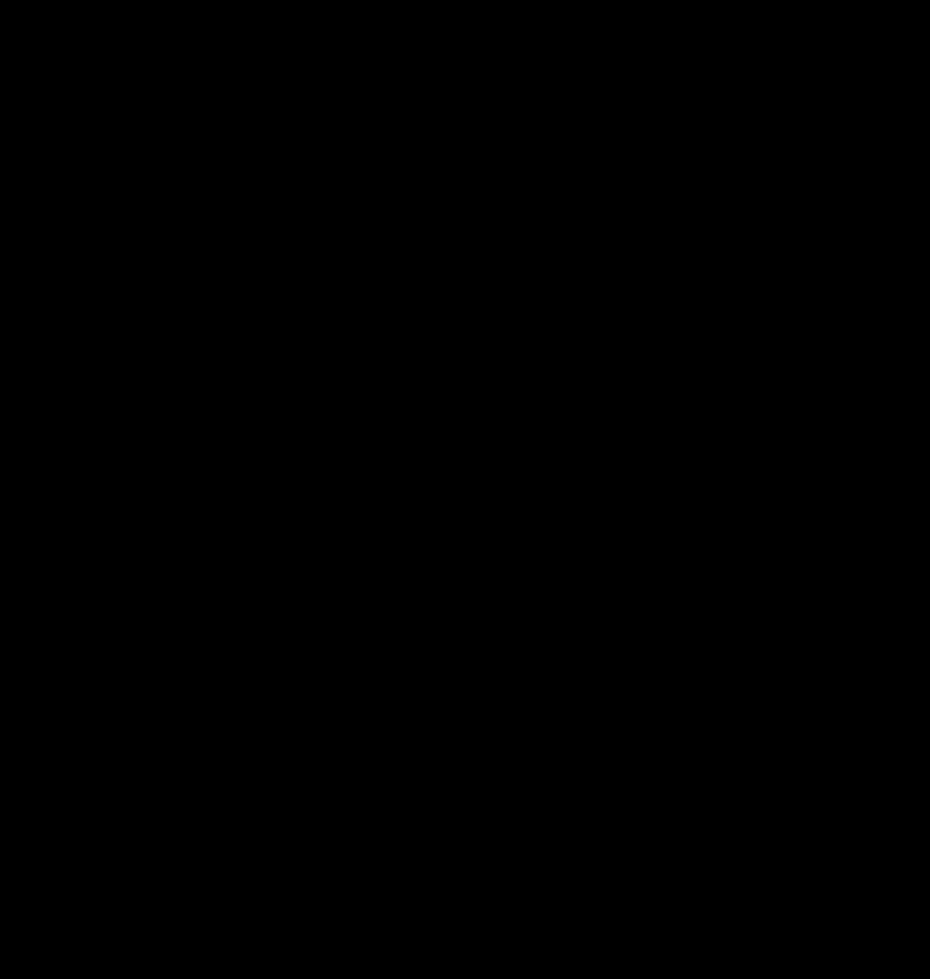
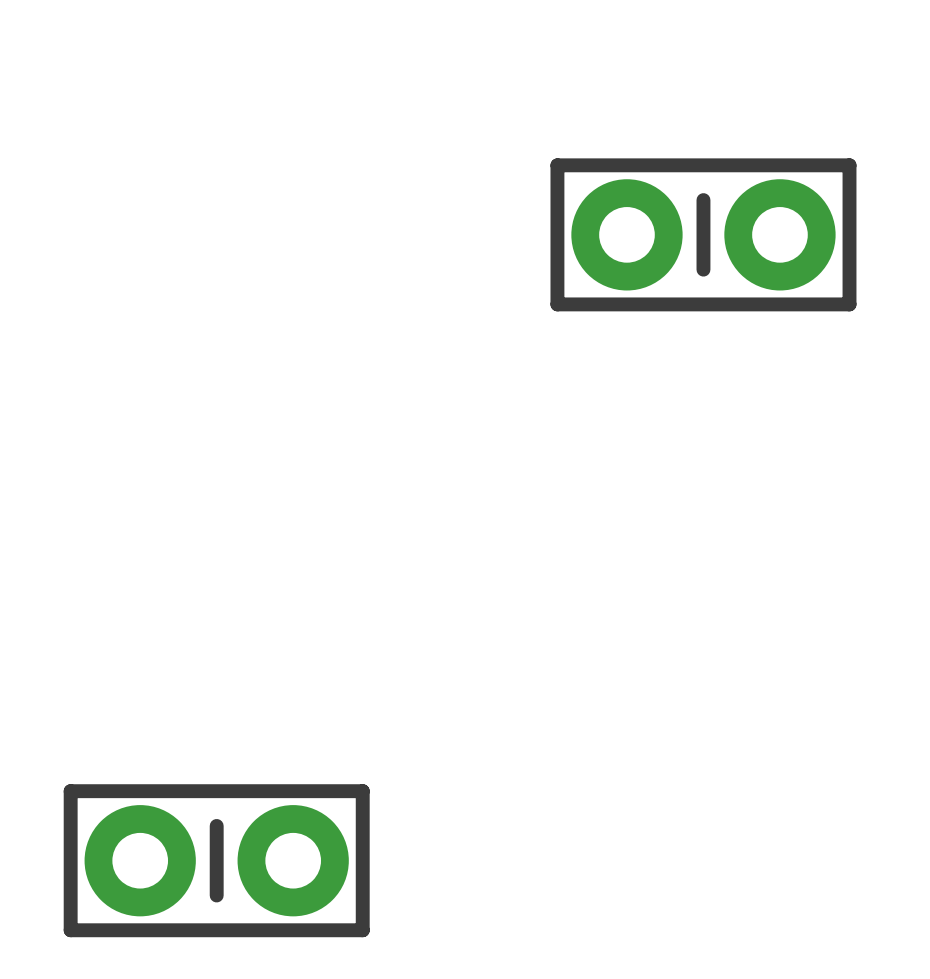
part: none -> (703, 234)
part: none -> (216, 860)

